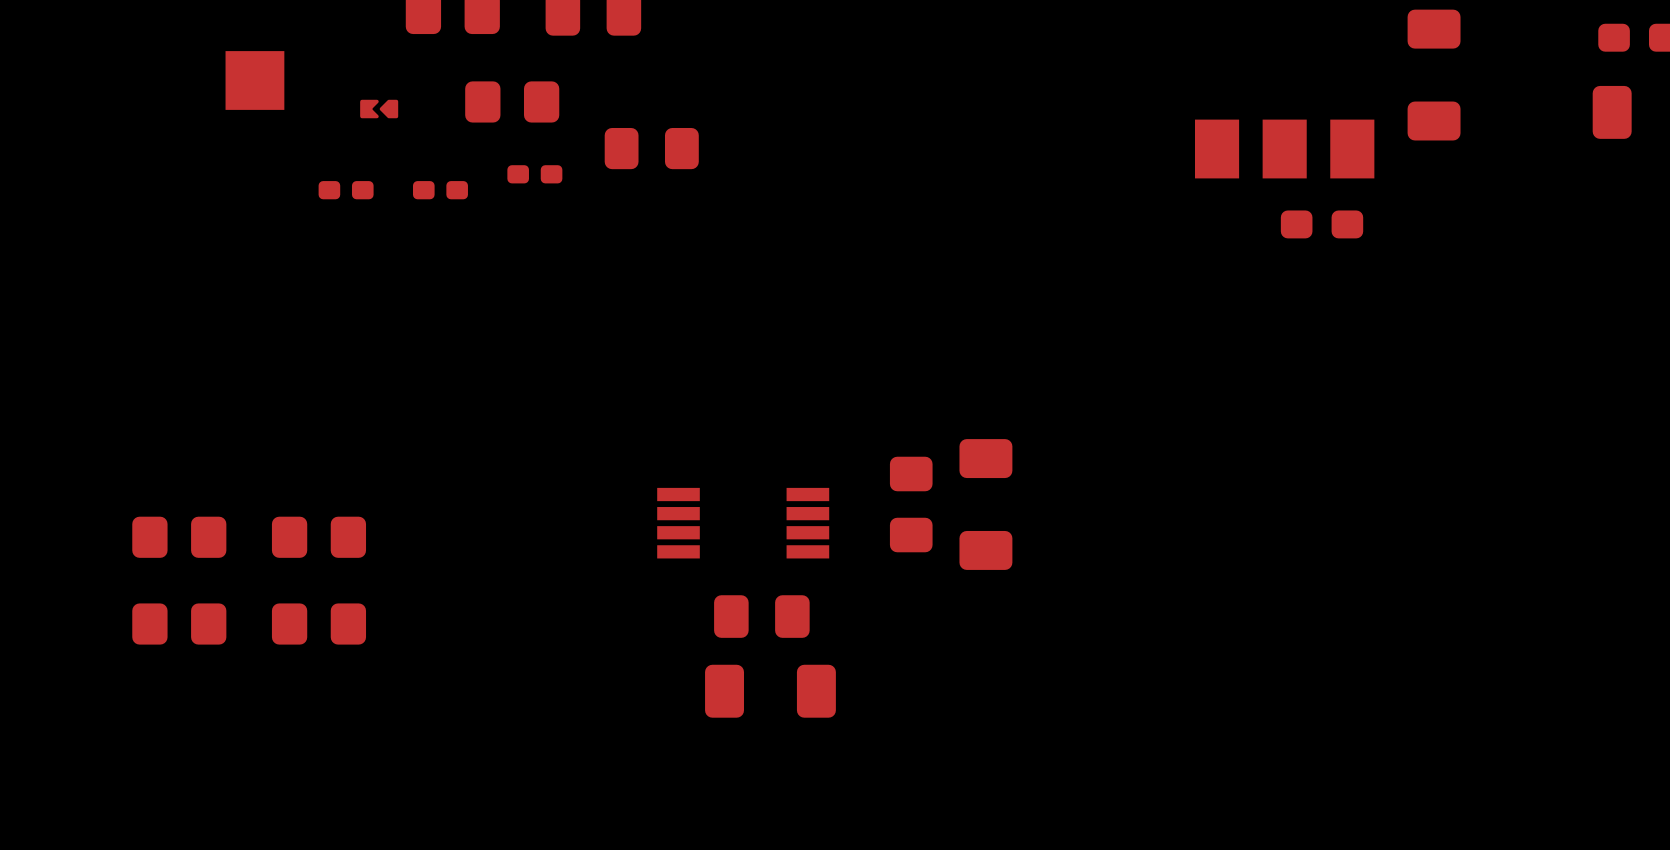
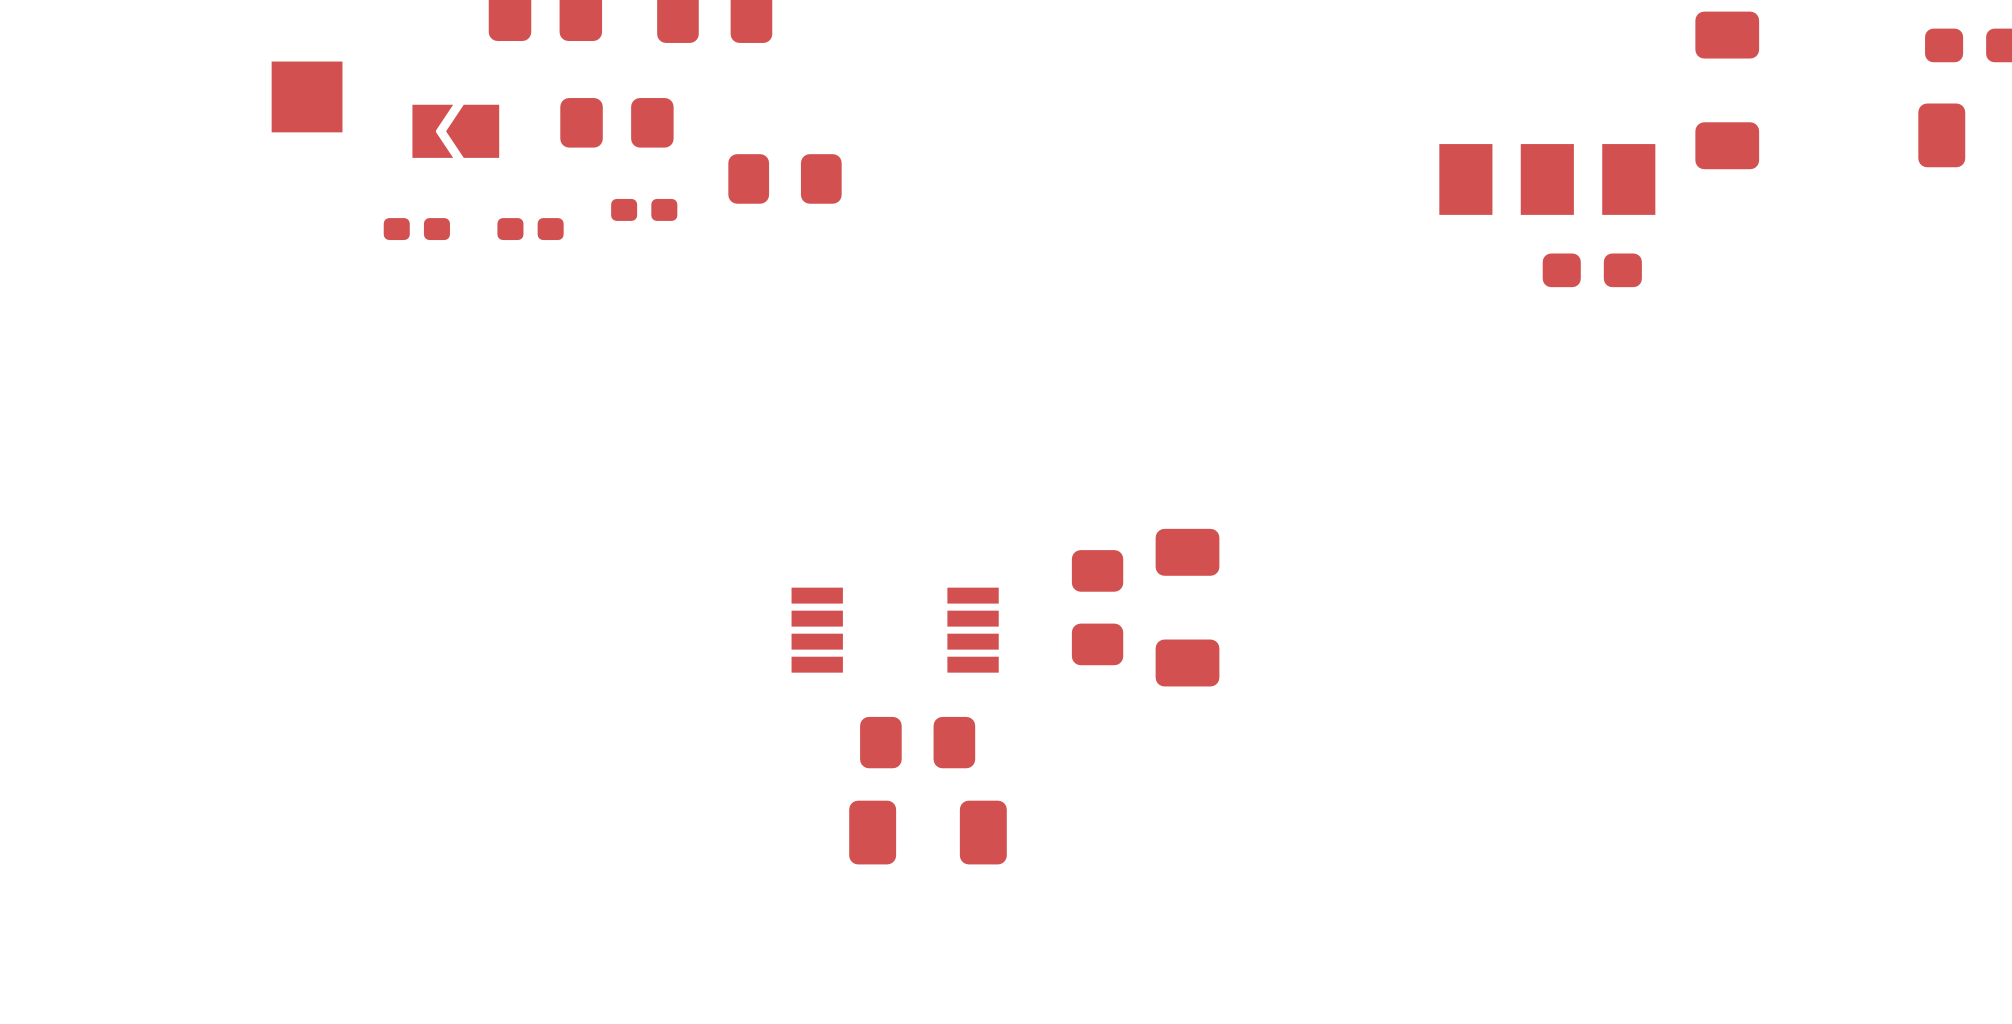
part footprint: [360, 99, 399, 119] -> [412, 104, 500, 158]
part: (179, 537) -> none
part: (318, 537) -> none
part: (179, 624) -> none
part: (318, 624) -> none

